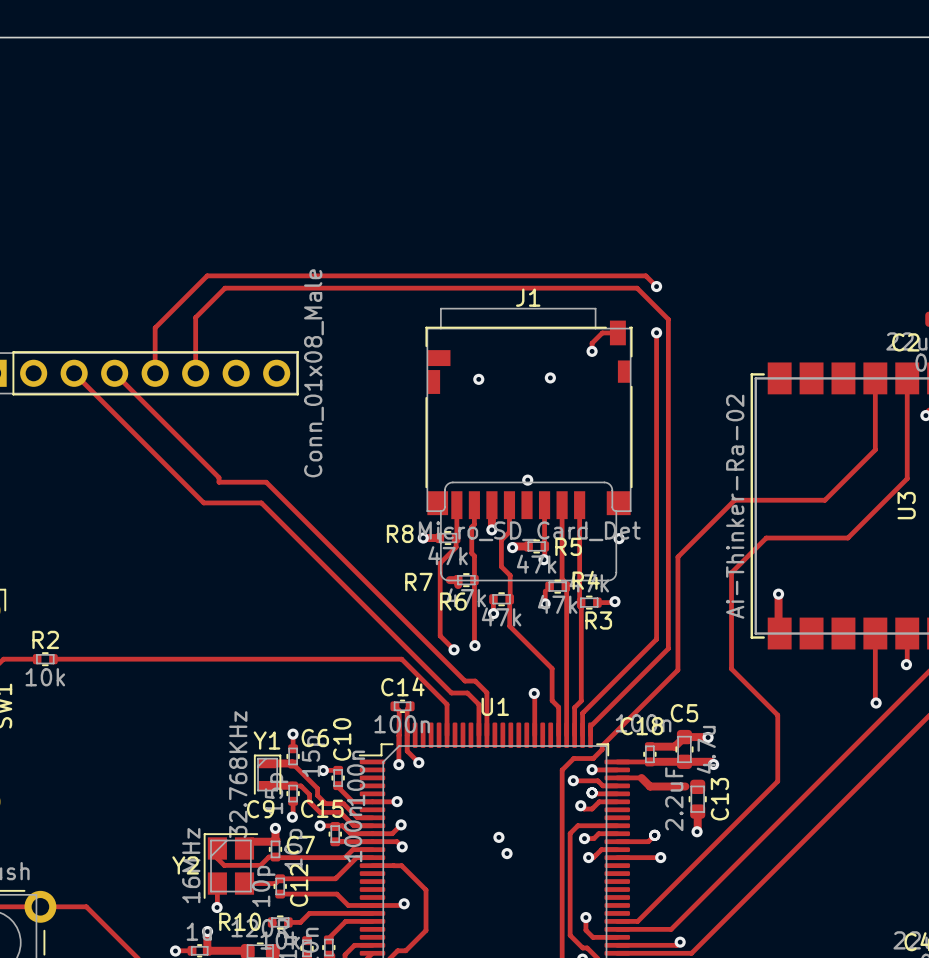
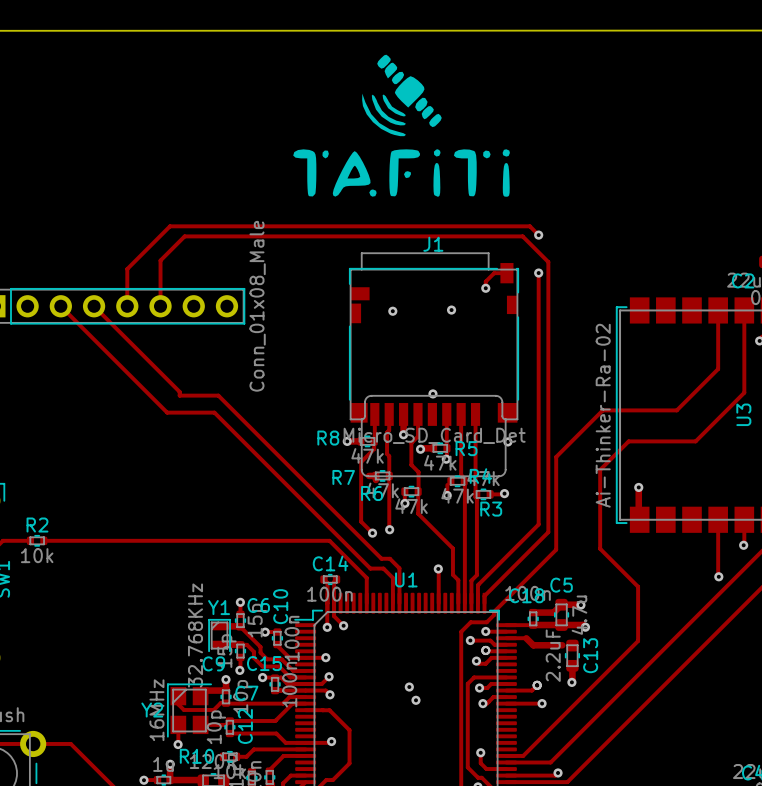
drawing: none -> [293, 54, 510, 197]

